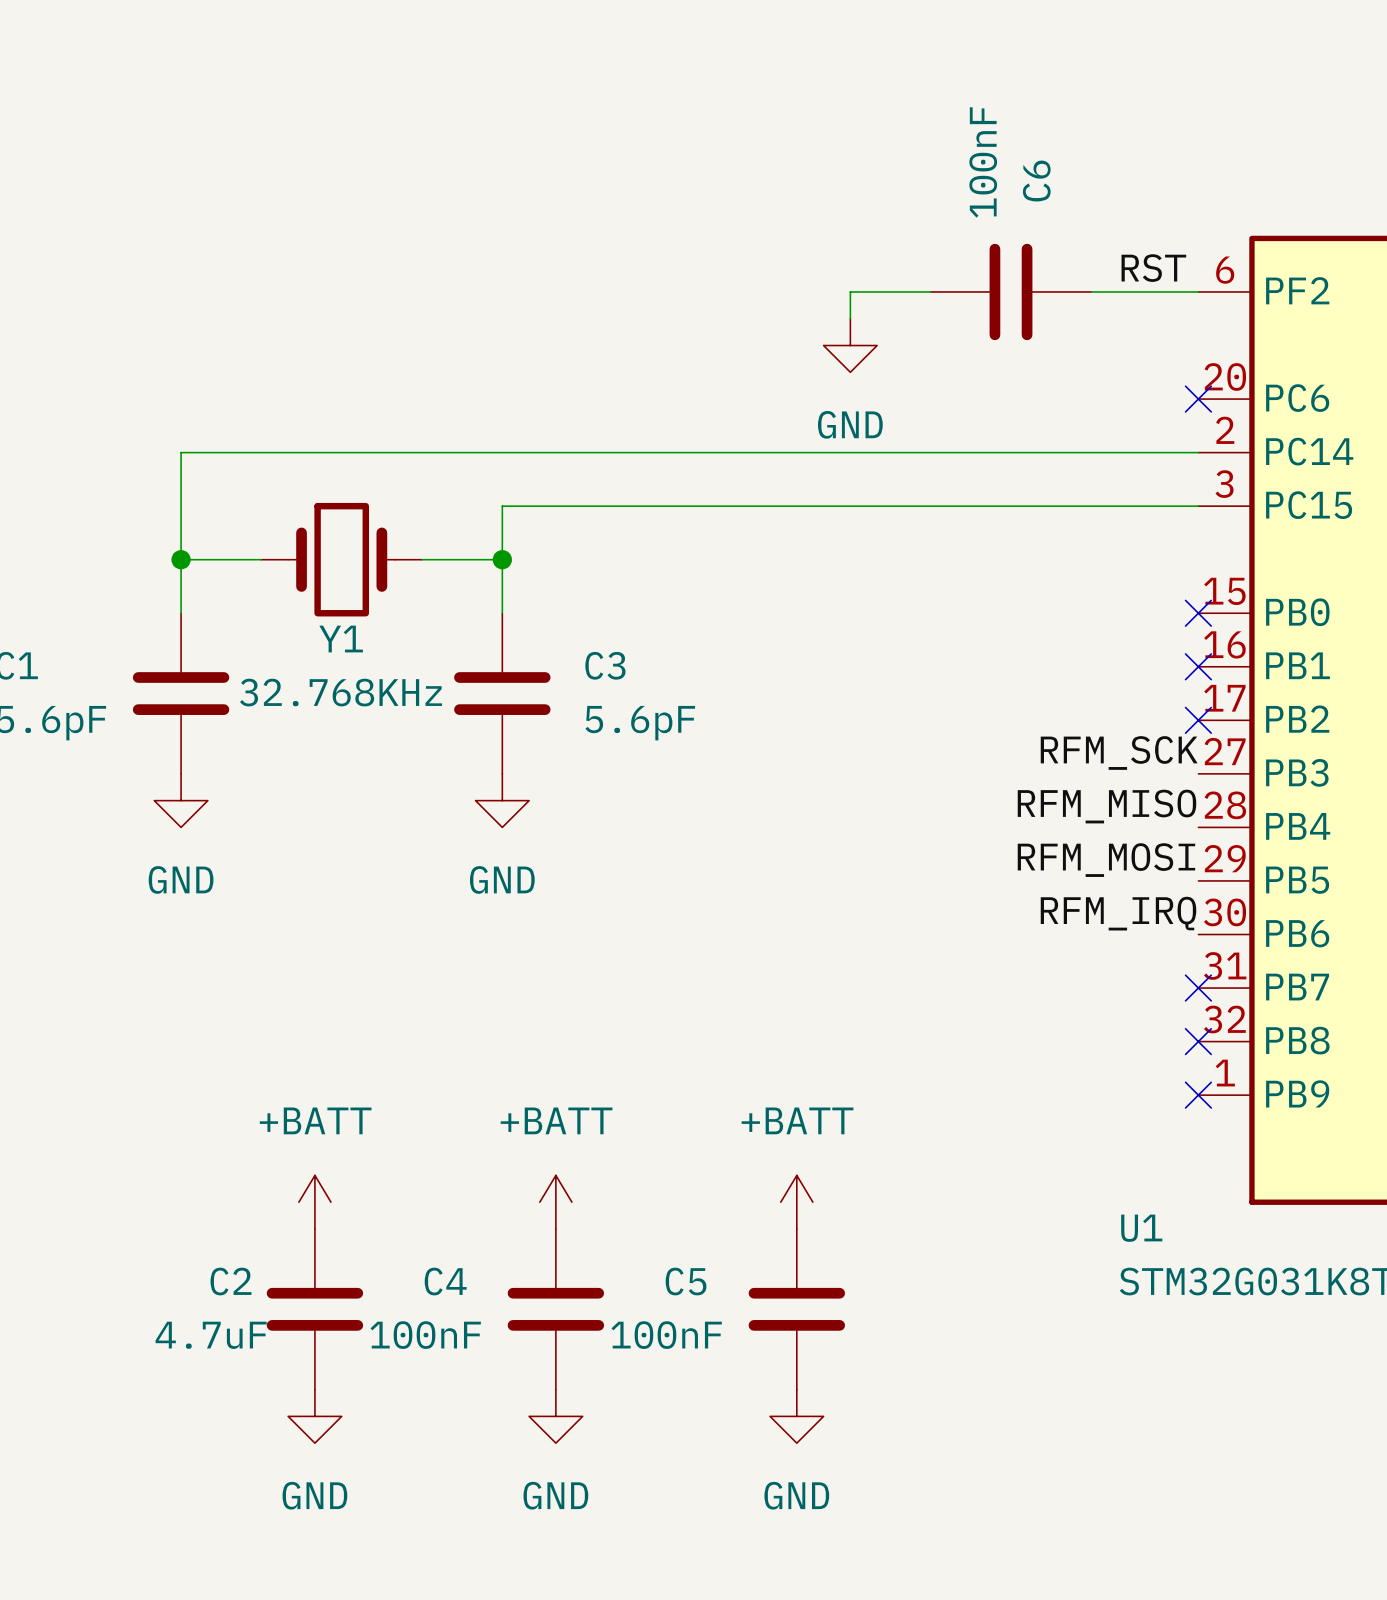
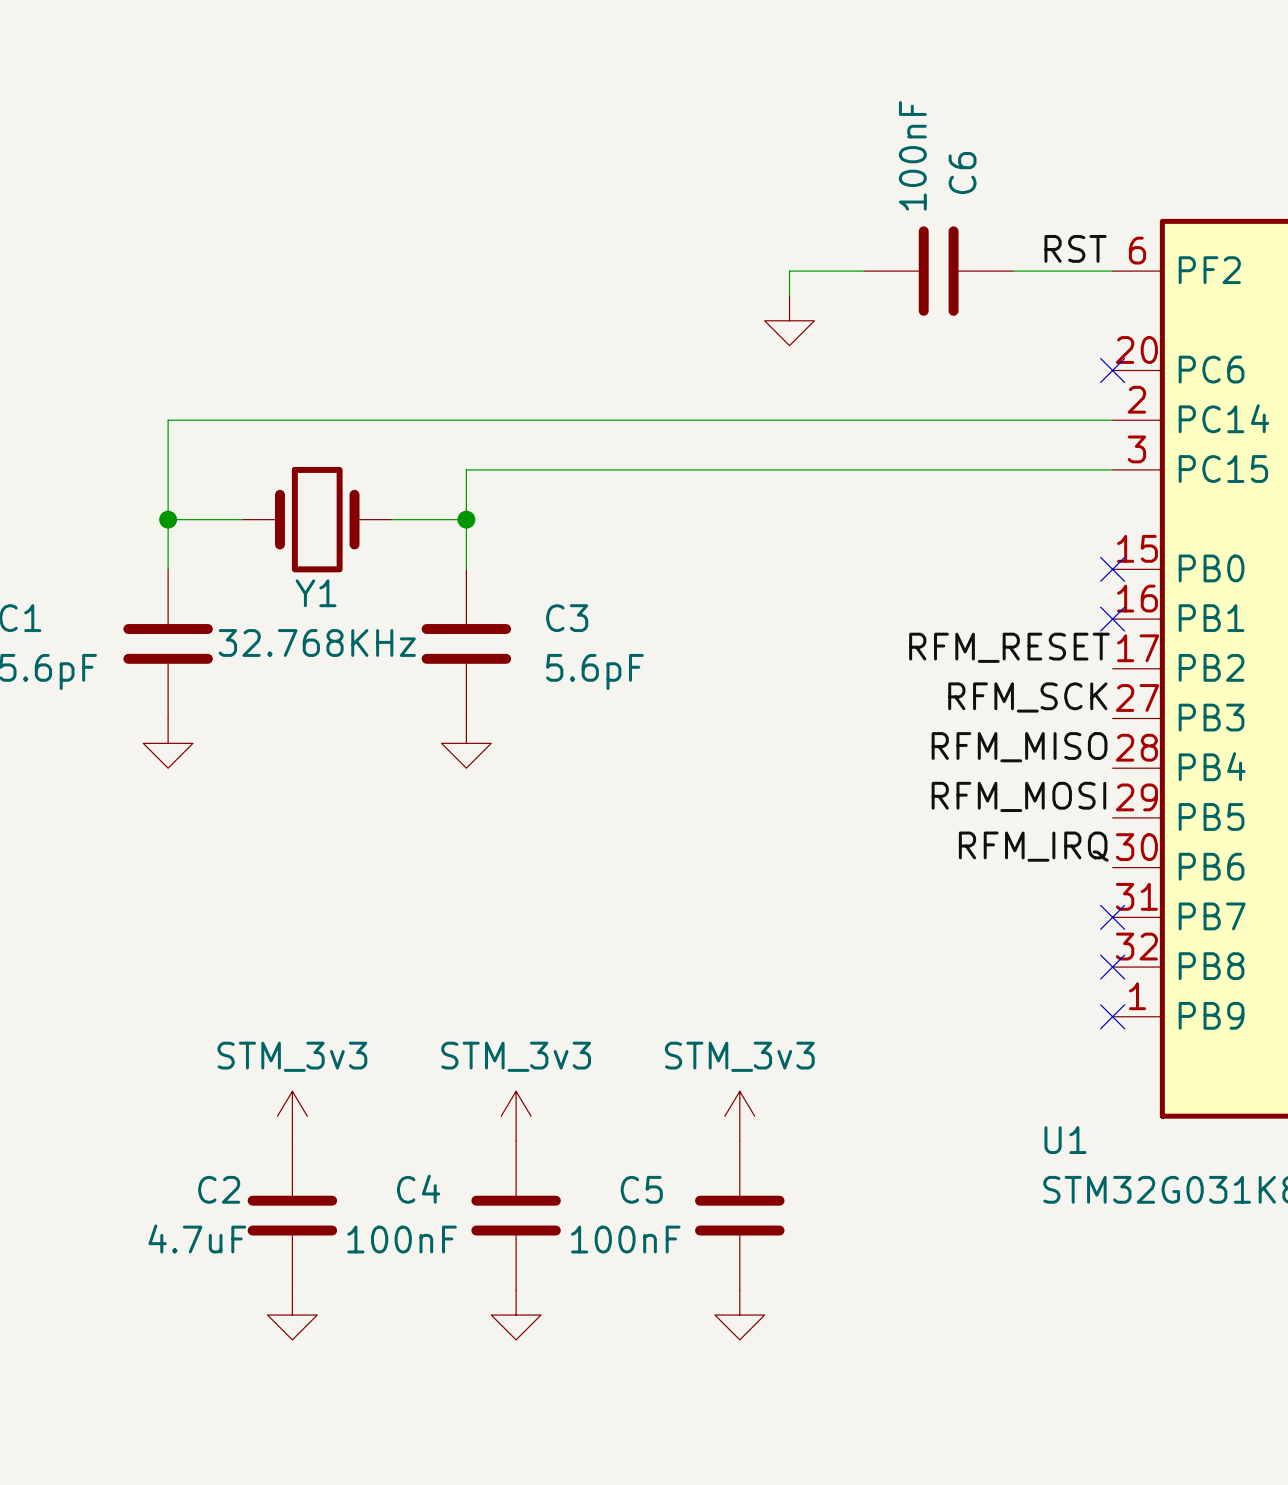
power symbol text: GND (850, 424) -> none
label: none -> RFM_RESET (1009, 647)
no-connect mark: (1198, 720) -> none
power symbol text: GND (181, 879) -> none
power symbol text: GND (502, 879) -> none
power symbol: +BATT (314, 1202) -> STM_3v3 (292, 1116)
power symbol: +BATT (555, 1202) -> STM_3v3 (516, 1116)
power symbol: +BATT (796, 1202) -> STM_3v3 (739, 1116)
power symbol text: GND (314, 1495) -> none
power symbol text: GND (555, 1495) -> none
power symbol text: GND (796, 1495) -> none

